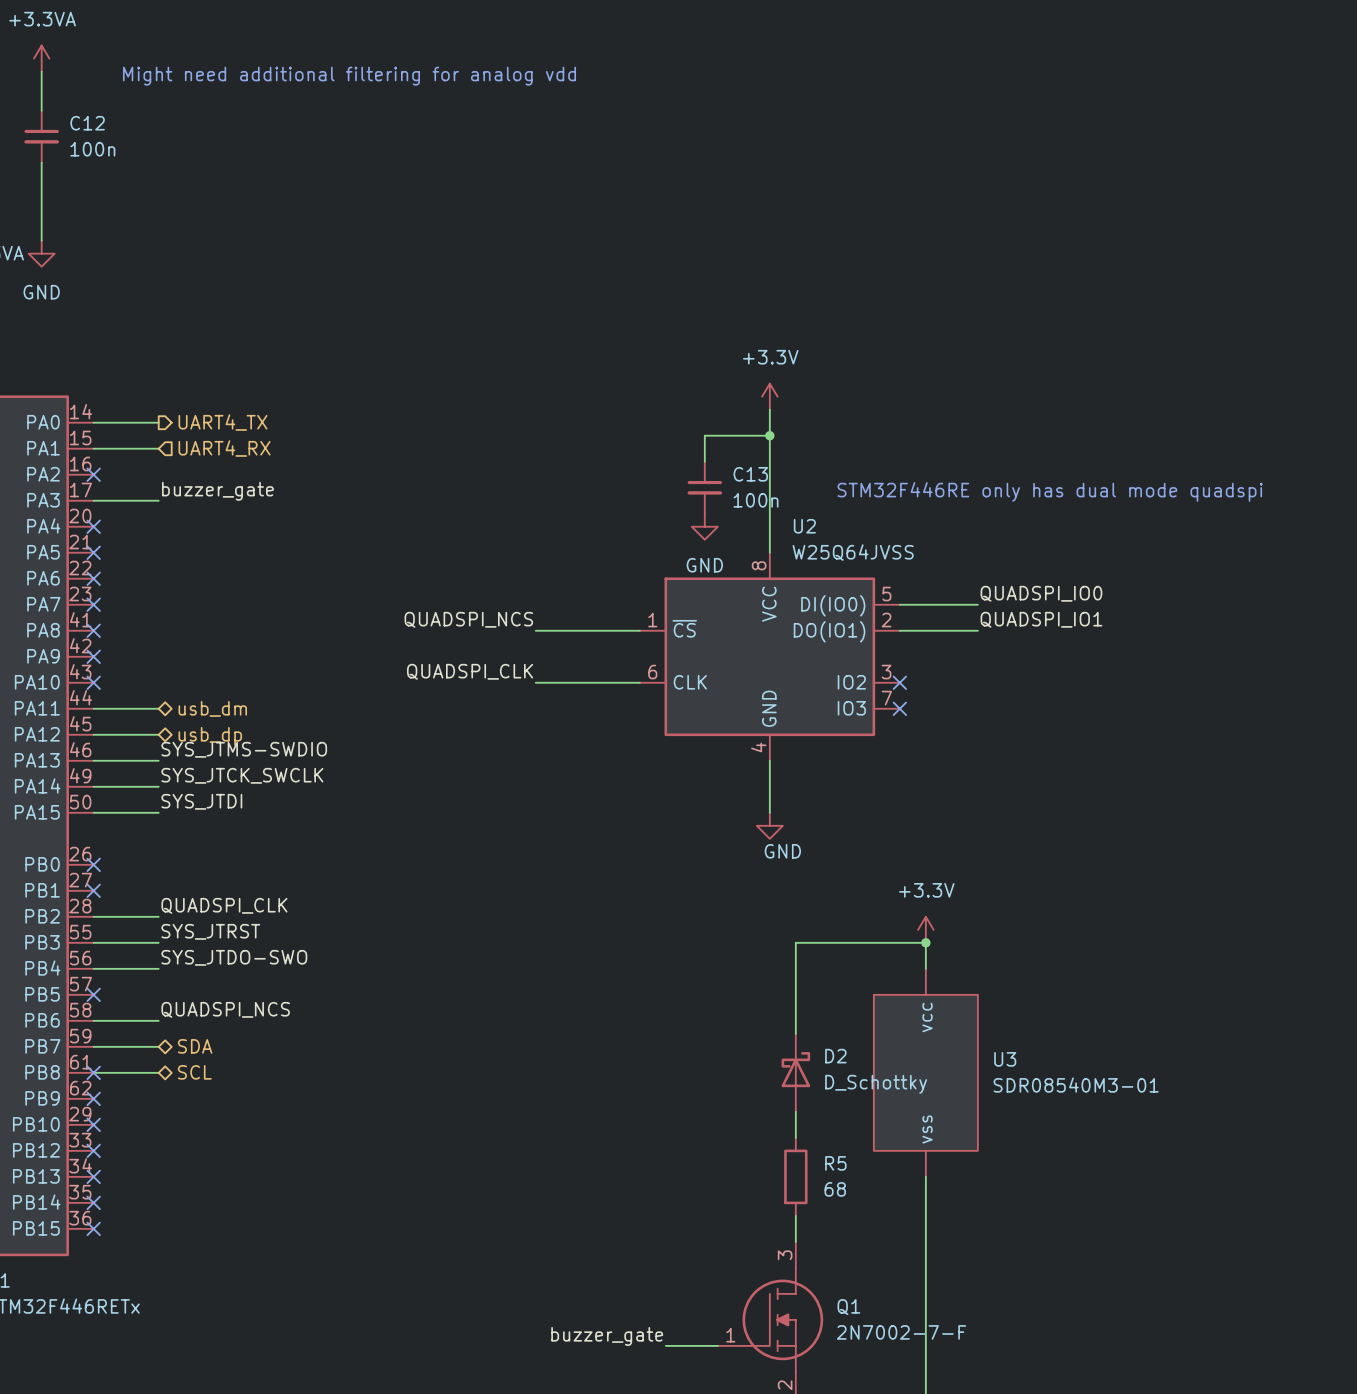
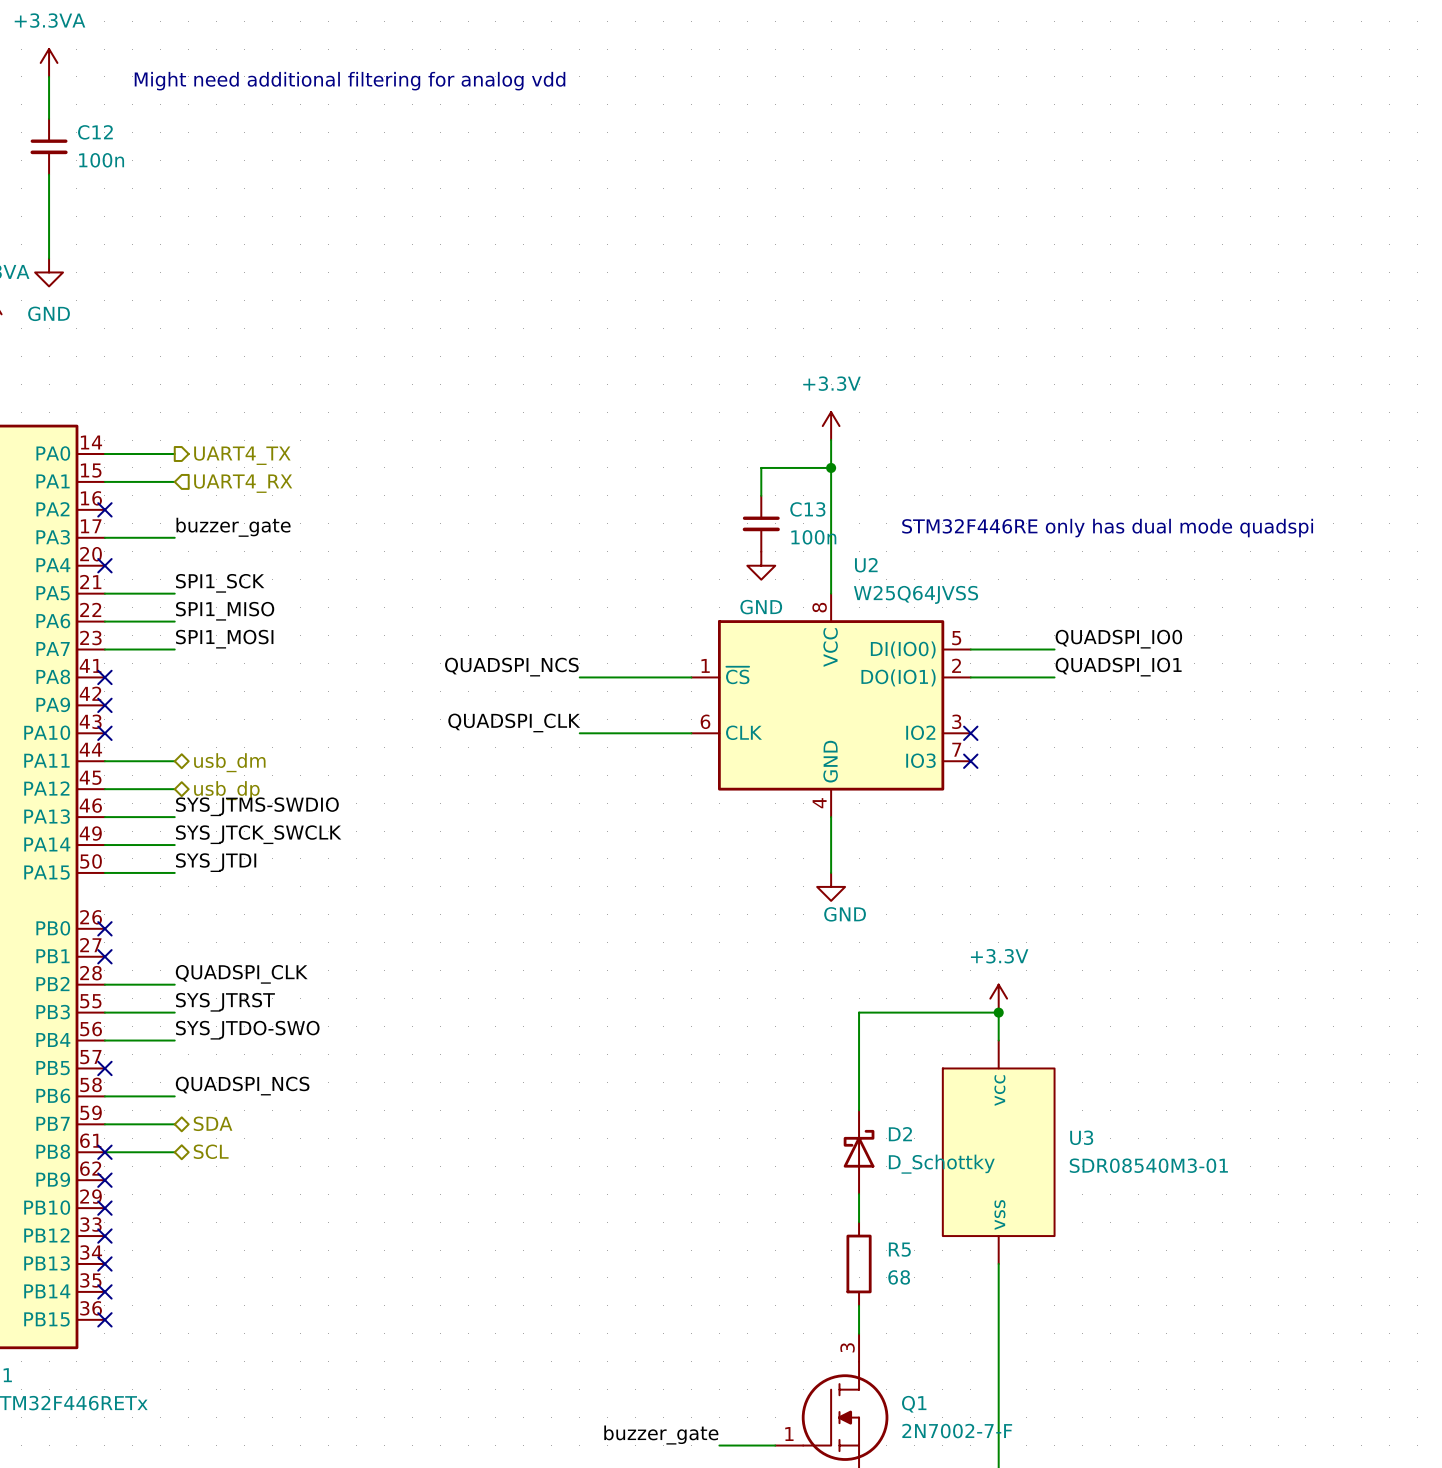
label: none -> SPI1_SCK (220, 583)
wire: none -> (104, 593) (174, 593)
no-connect mark: (93, 552) -> none
label: none -> SPI1_MISO (225, 611)
wire: none -> (104, 621) (174, 621)
no-connect mark: (93, 578) -> none
label: none -> SPI1_MOSI (224, 639)
wire: none -> (104, 649) (174, 649)
no-connect mark: (93, 604) -> none

